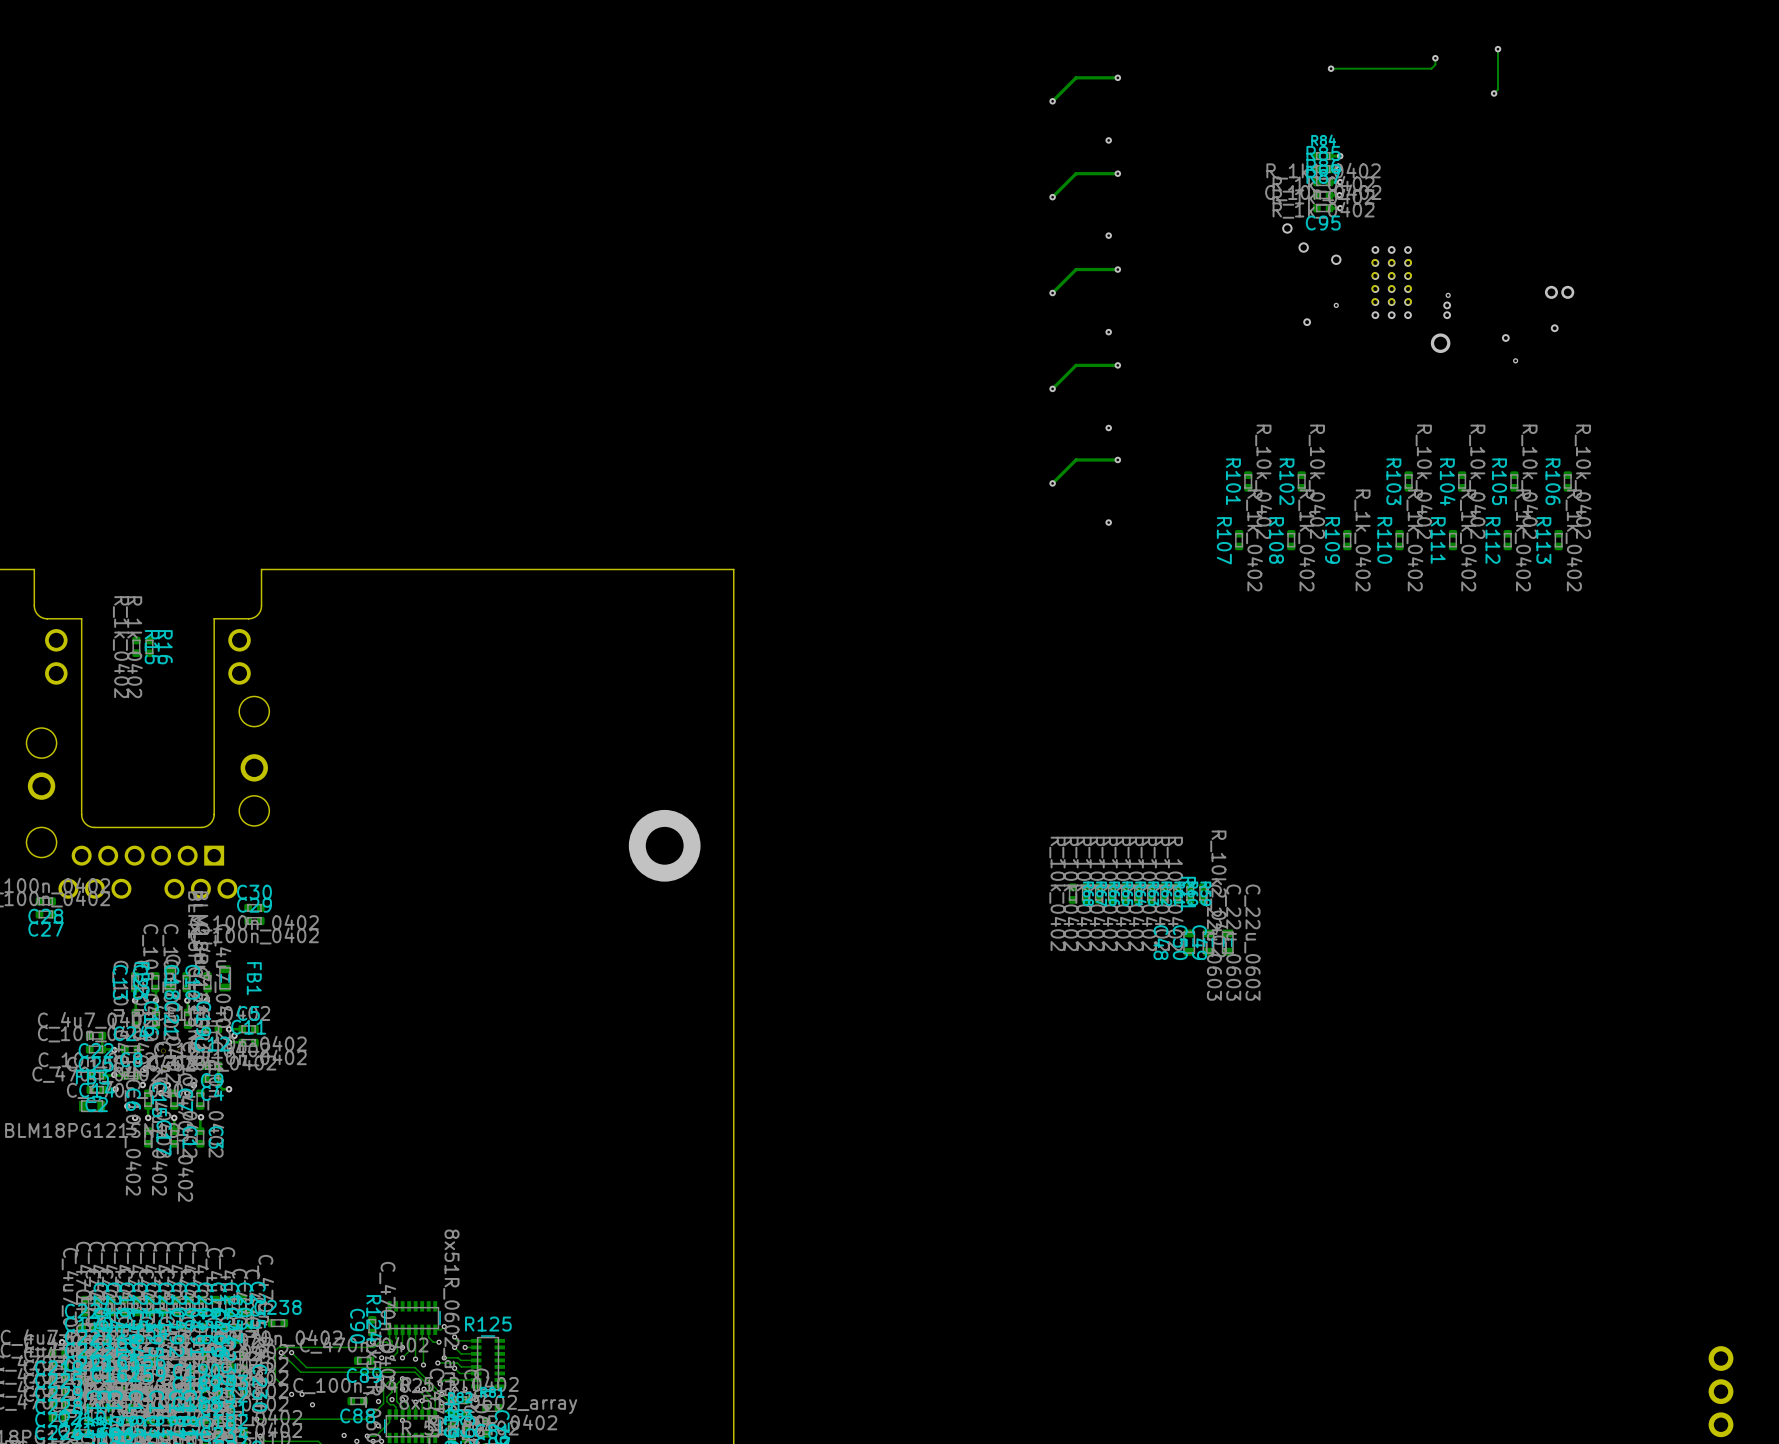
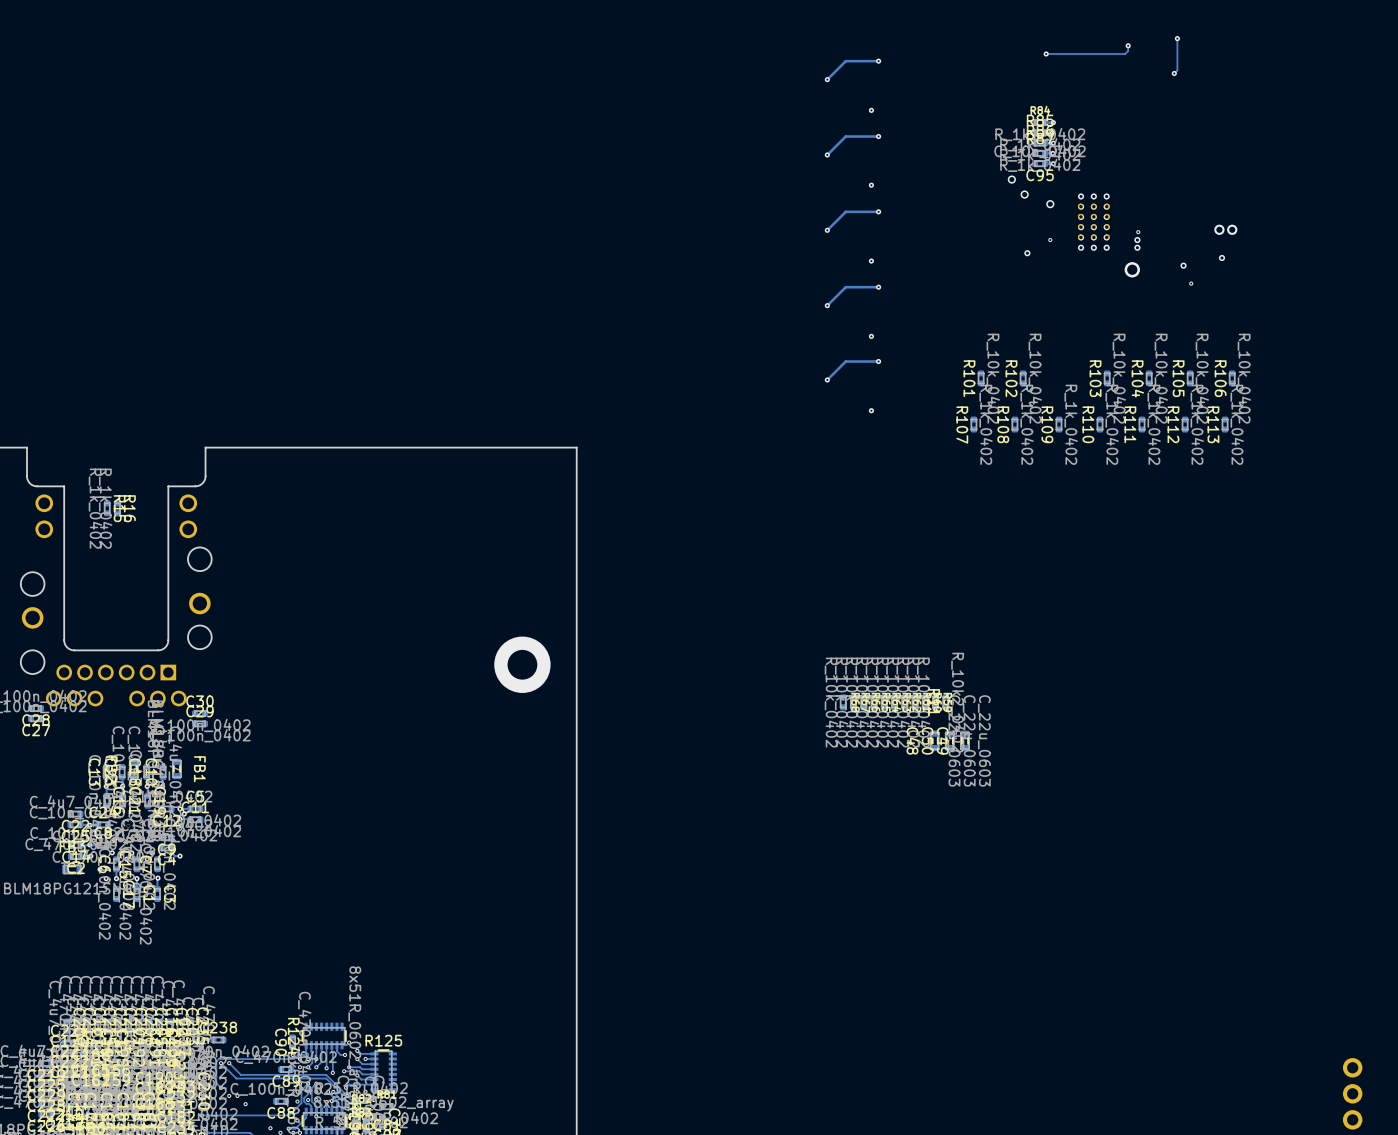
via: (62, 1342) -> none

